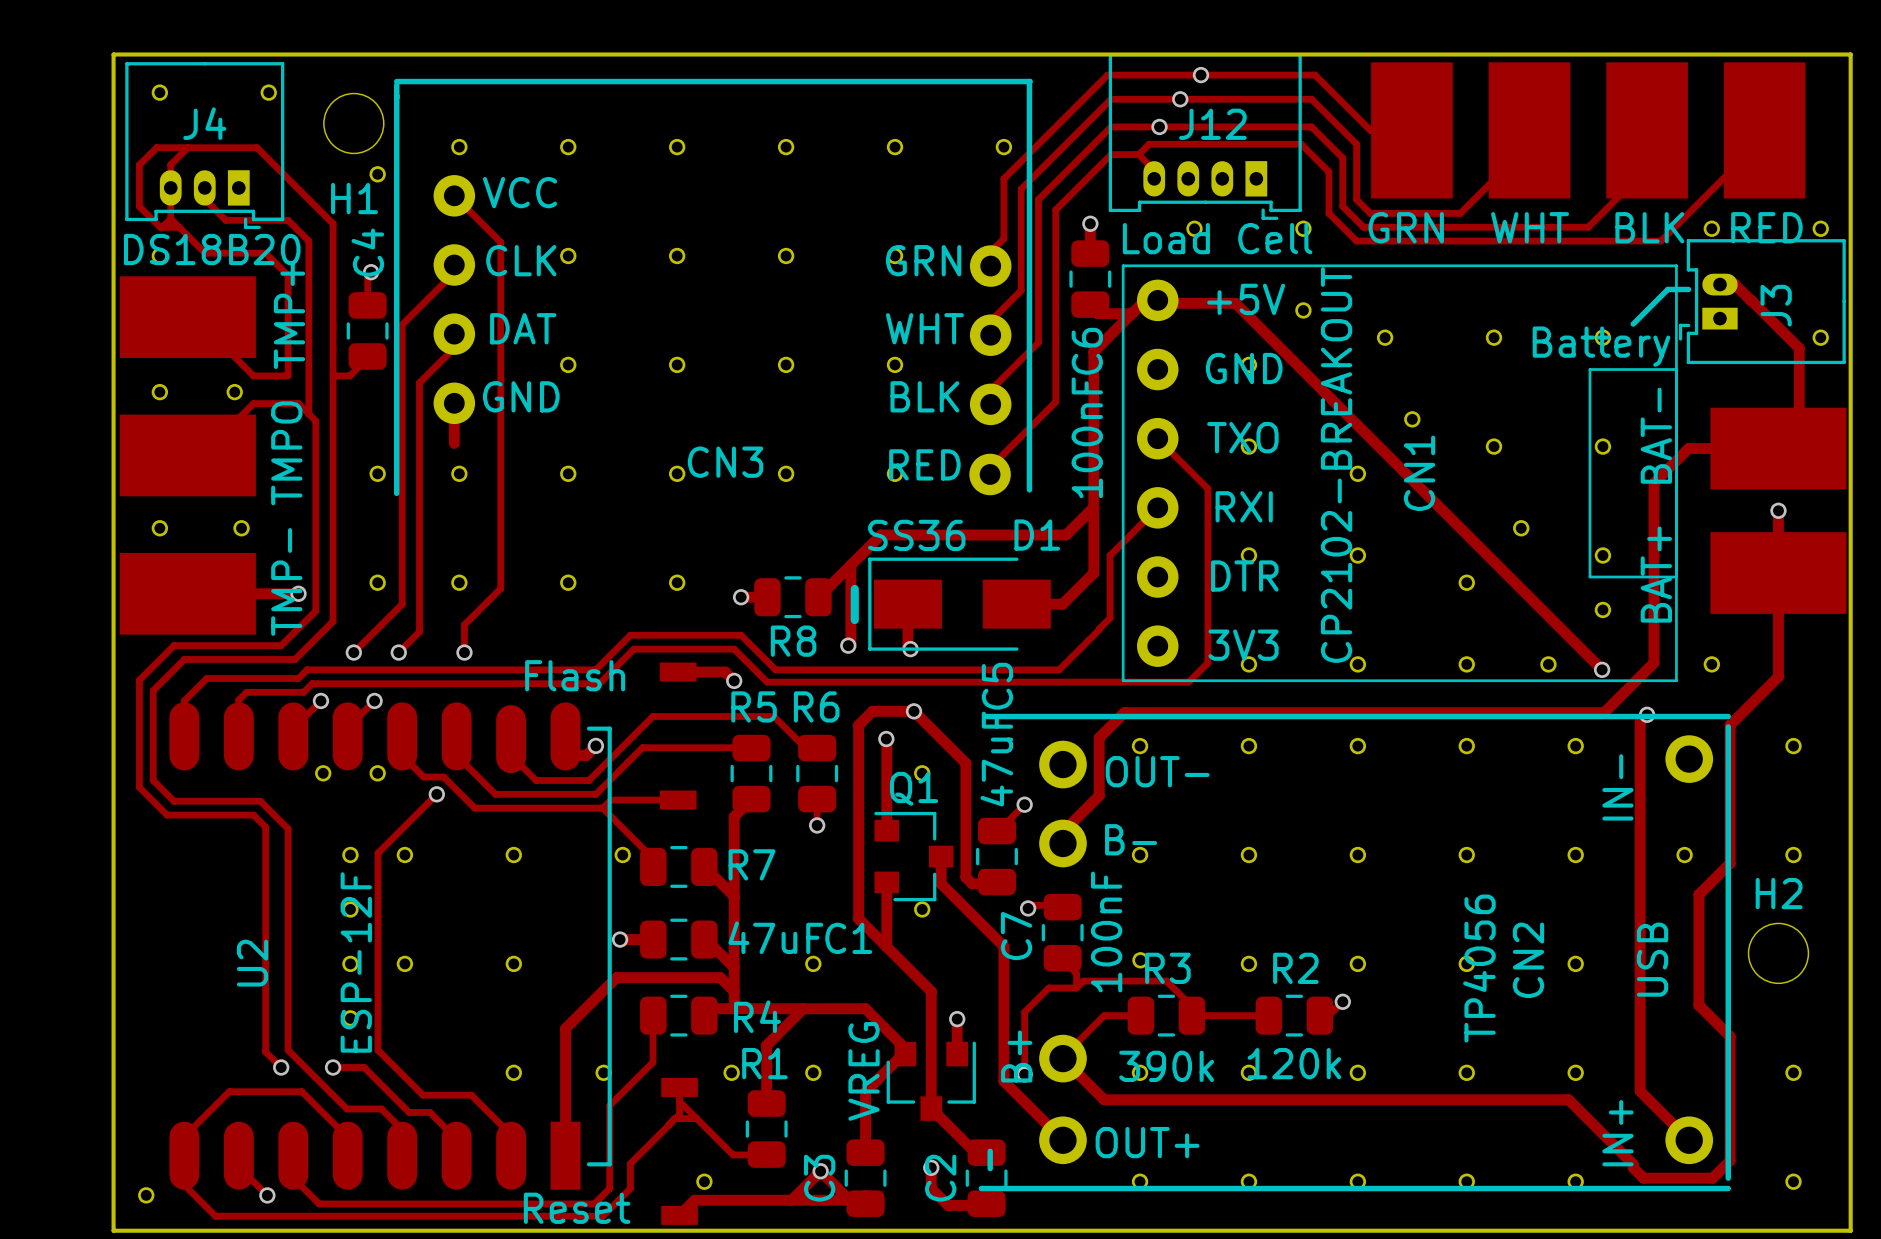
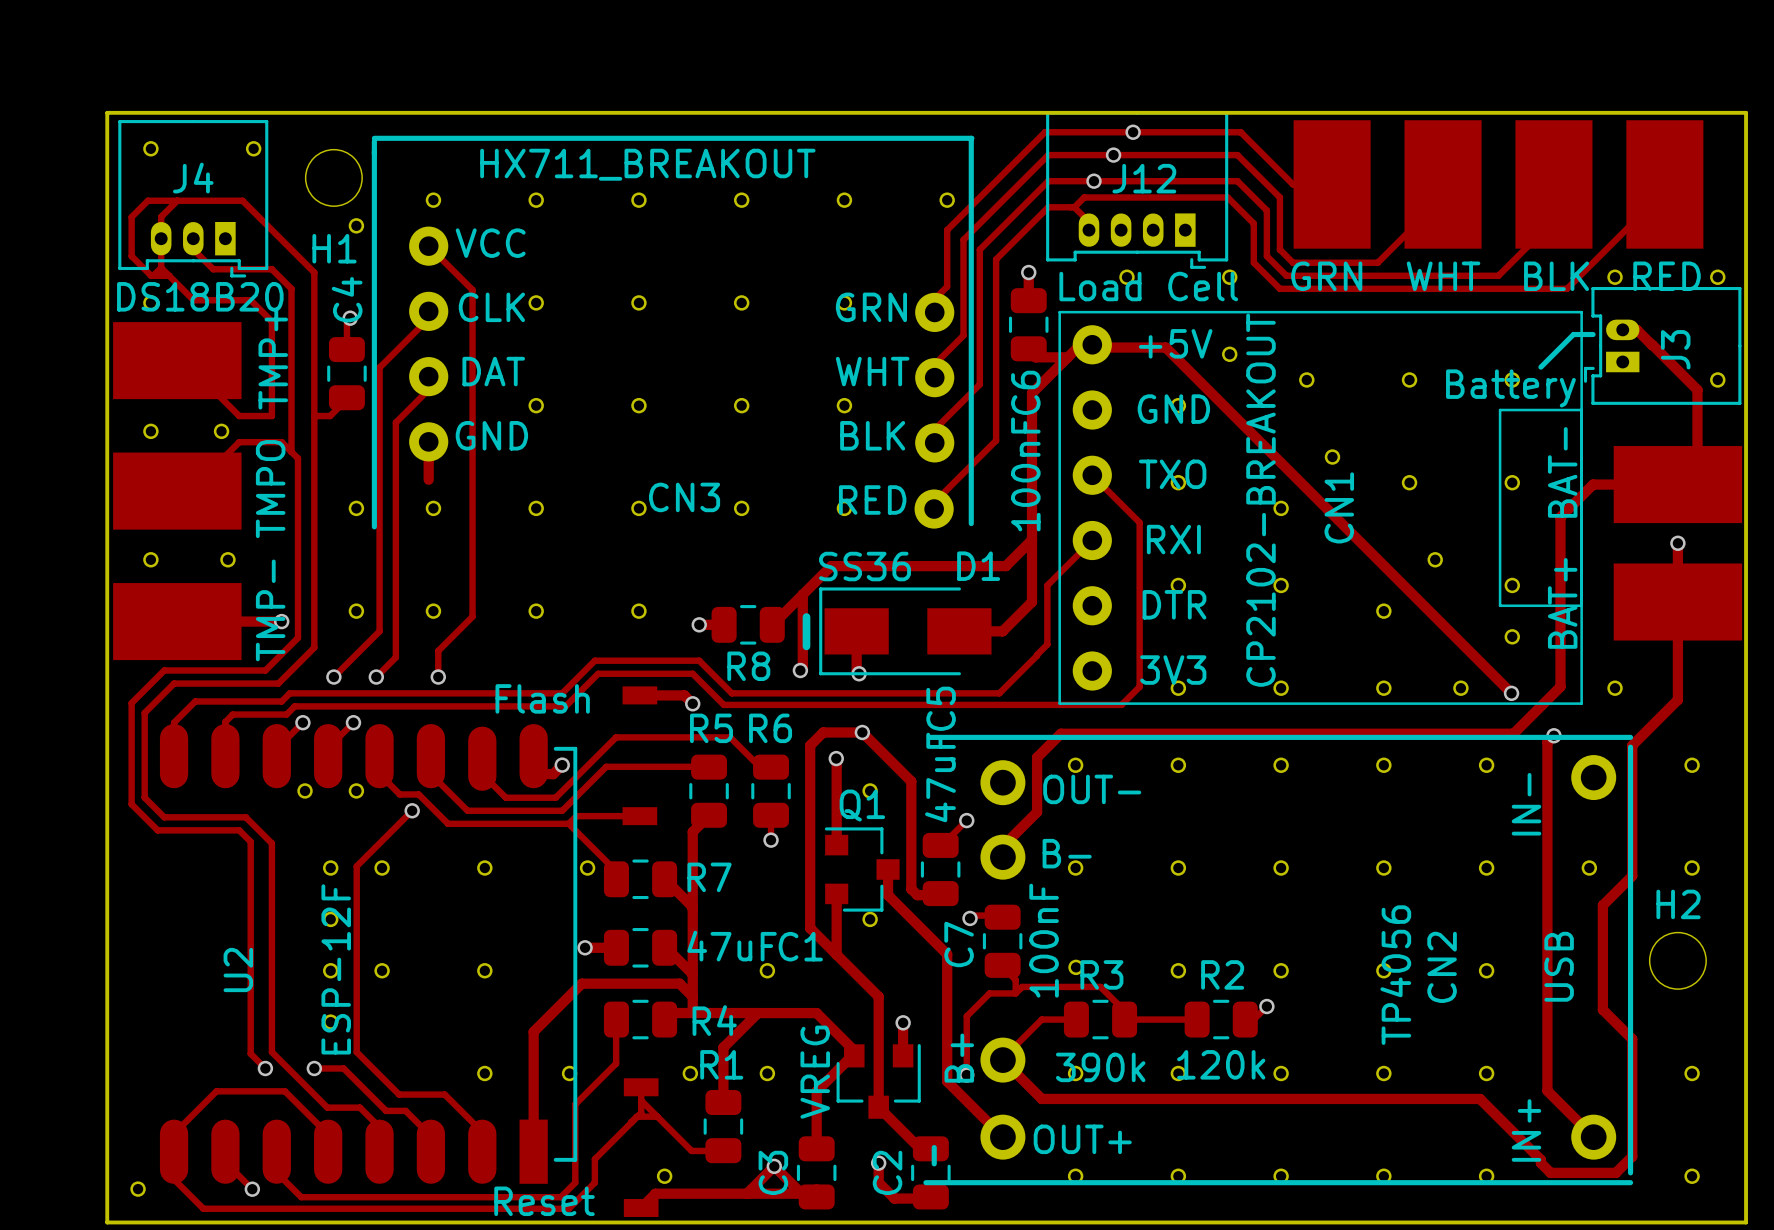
CN3 value: none -> HX711_BREAKOUT (647, 164)

